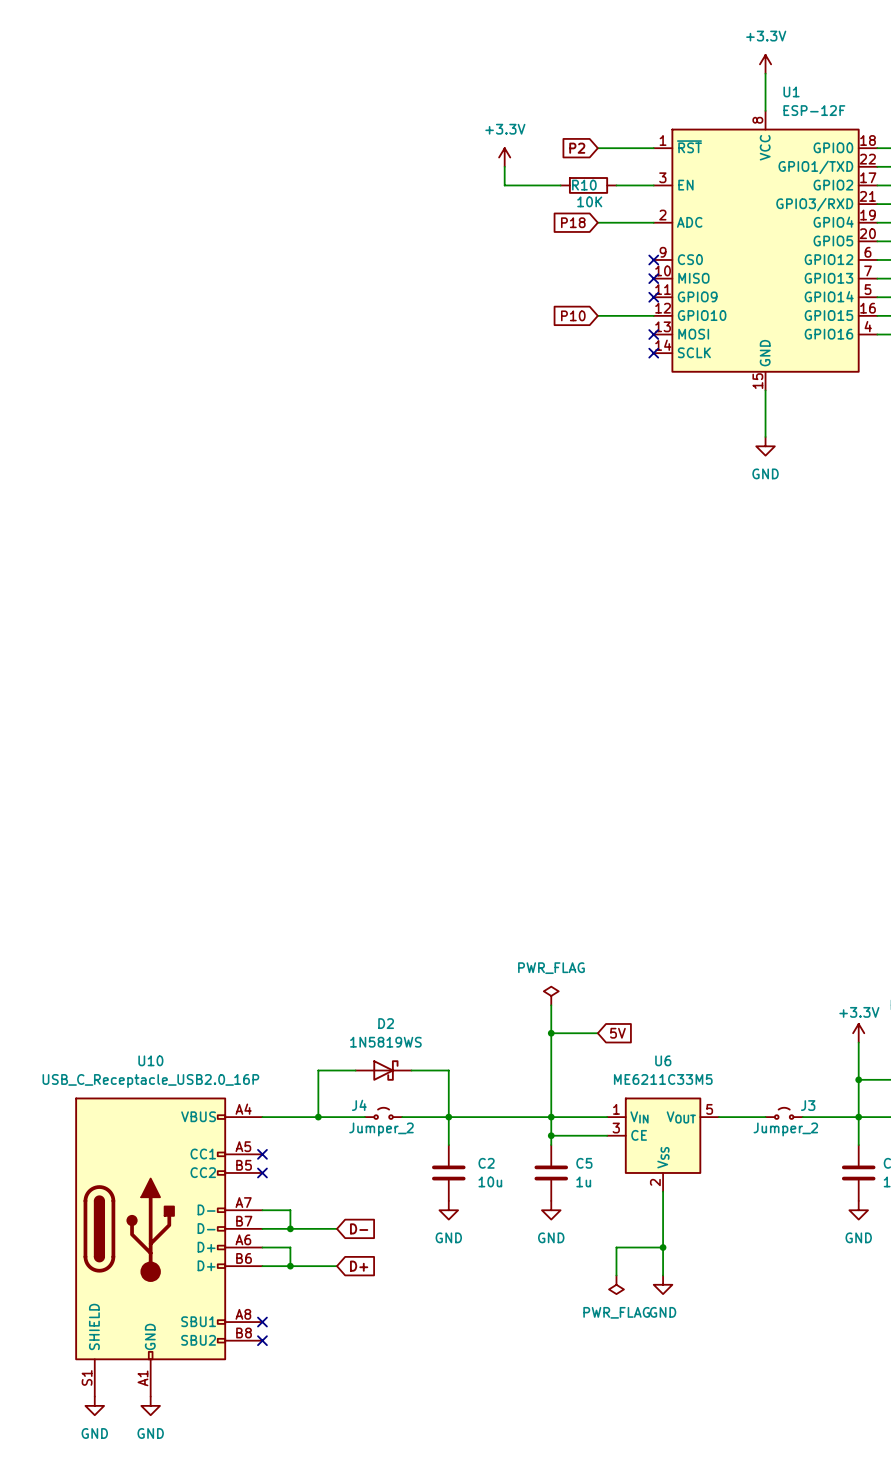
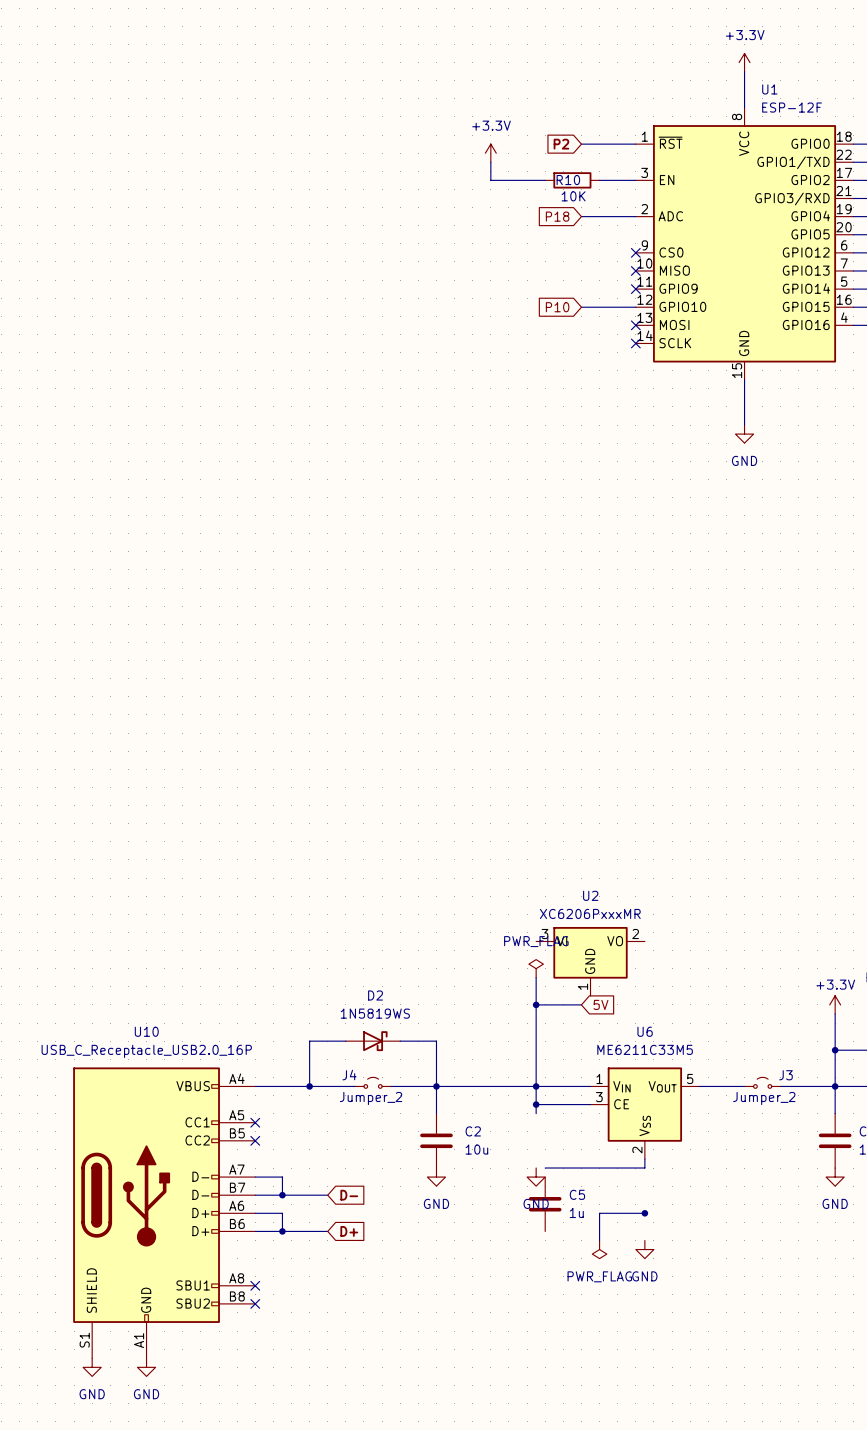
U2: none -> XC6206PxxxMR (590, 961)
C5 position: (551, 1172) -> (545, 1204)
wire: (663, 1200) (663, 1275) -> (644, 1168) (545, 1168)

